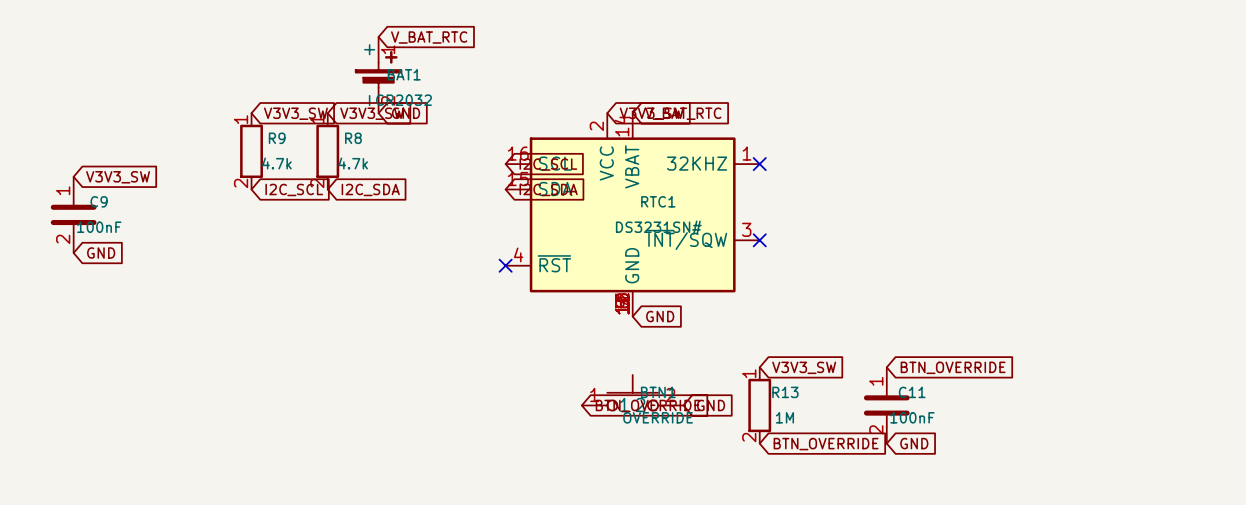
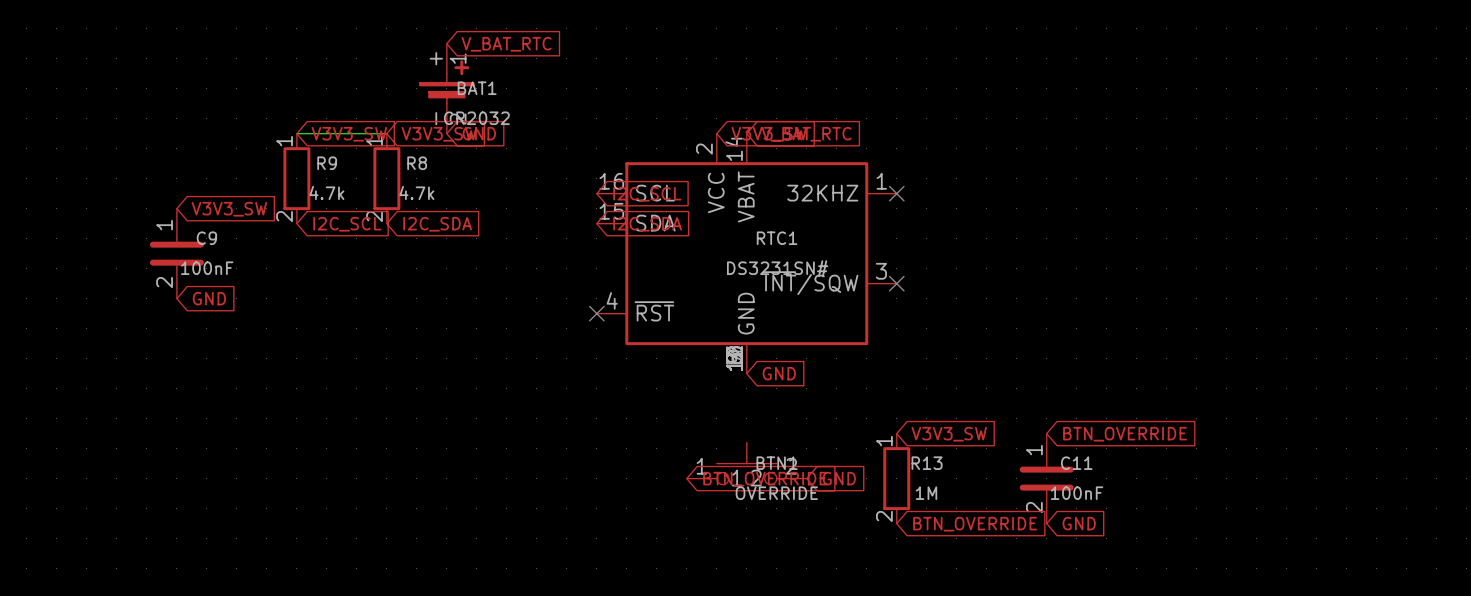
wire: none -> (296, 133) (386, 133)
global label position: V3V3_SW (118, 177) -> V3V3_SW (229, 209)
C9 position: (73, 214) -> (176, 253)
global label position: GND (101, 253) -> GND (209, 298)

